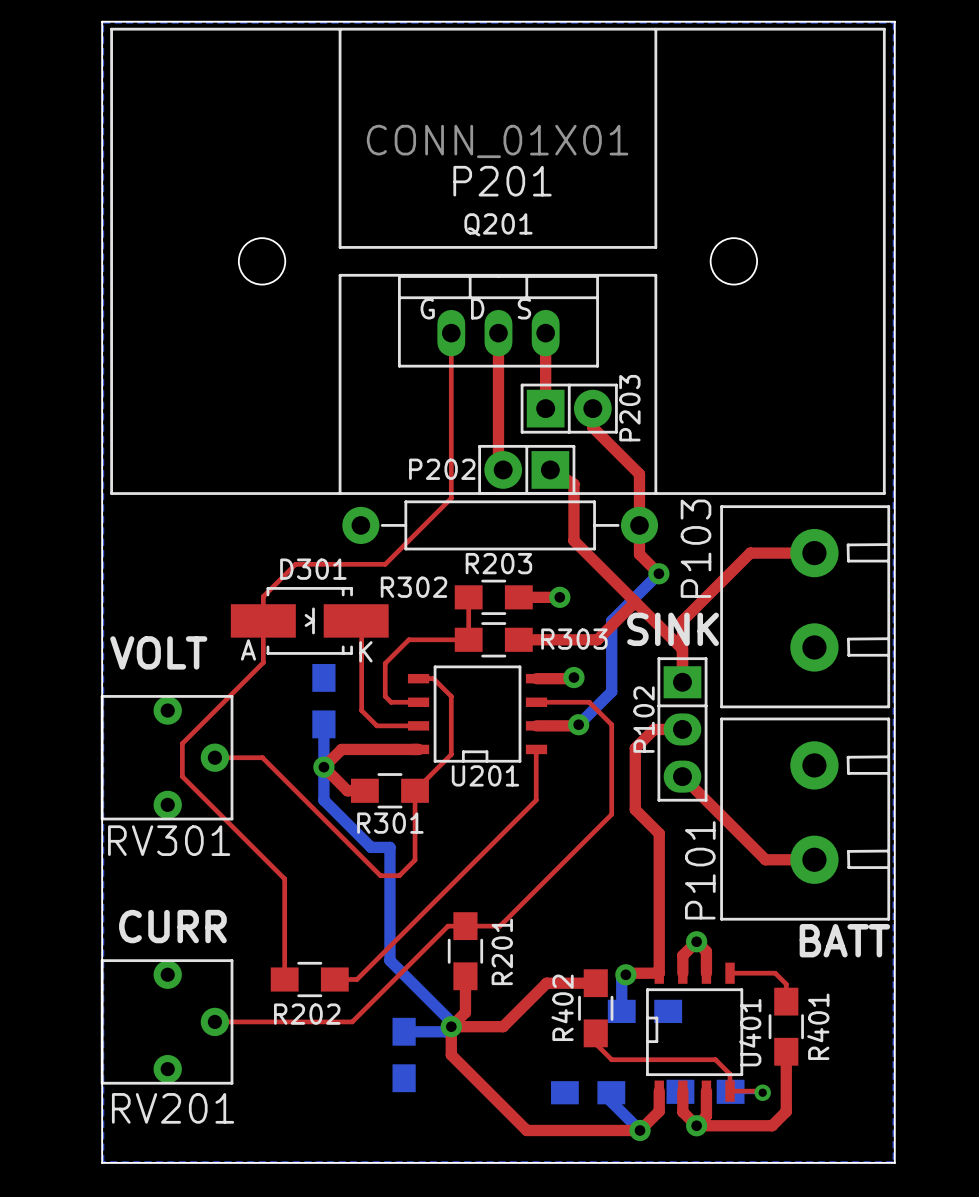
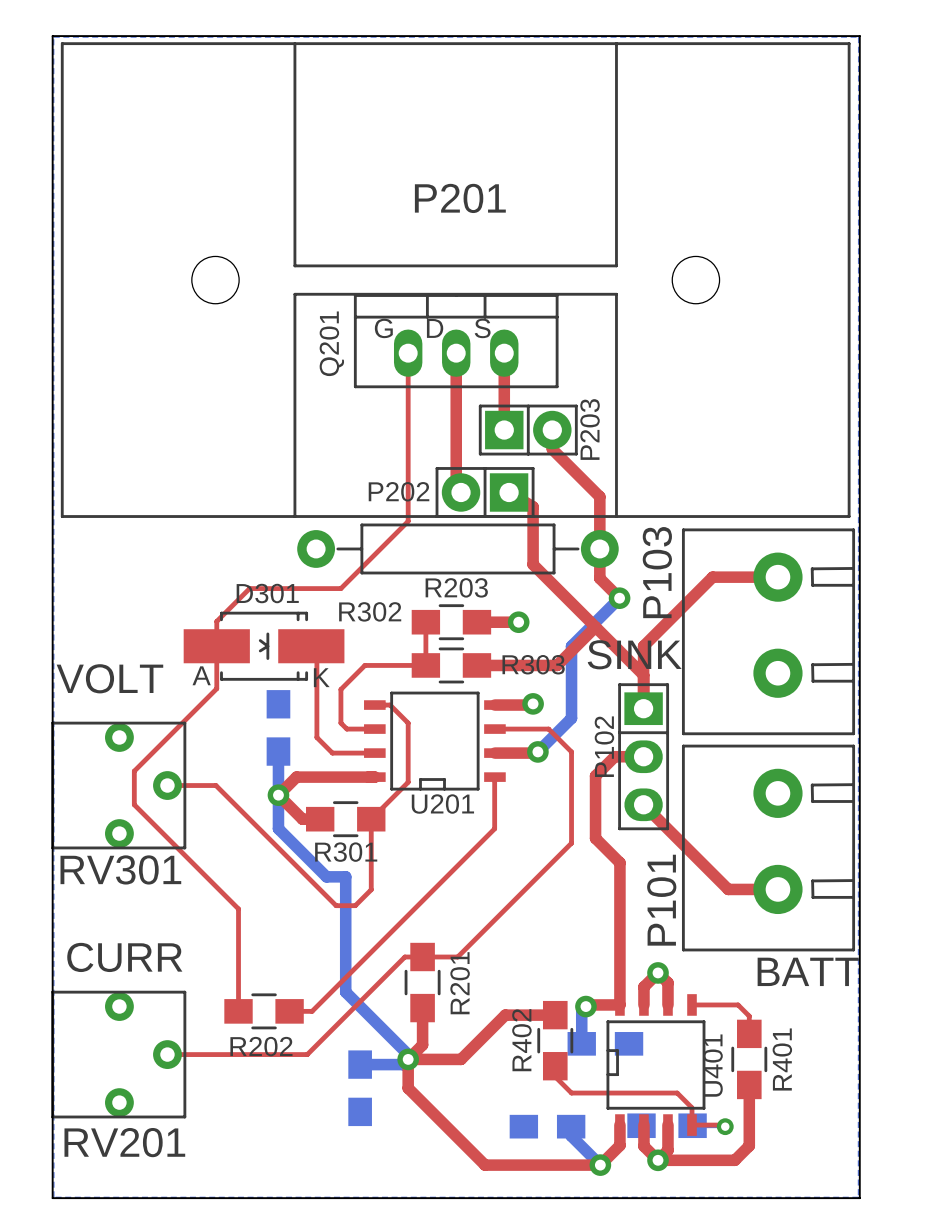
P201 value: CONN_01X01 (497, 141) -> none
Q201 name rotation: 0° (498, 224) -> 90° counterclockwise (331, 343)
Q201 name position: Q201 (498, 224) -> Q201 (331, 343)

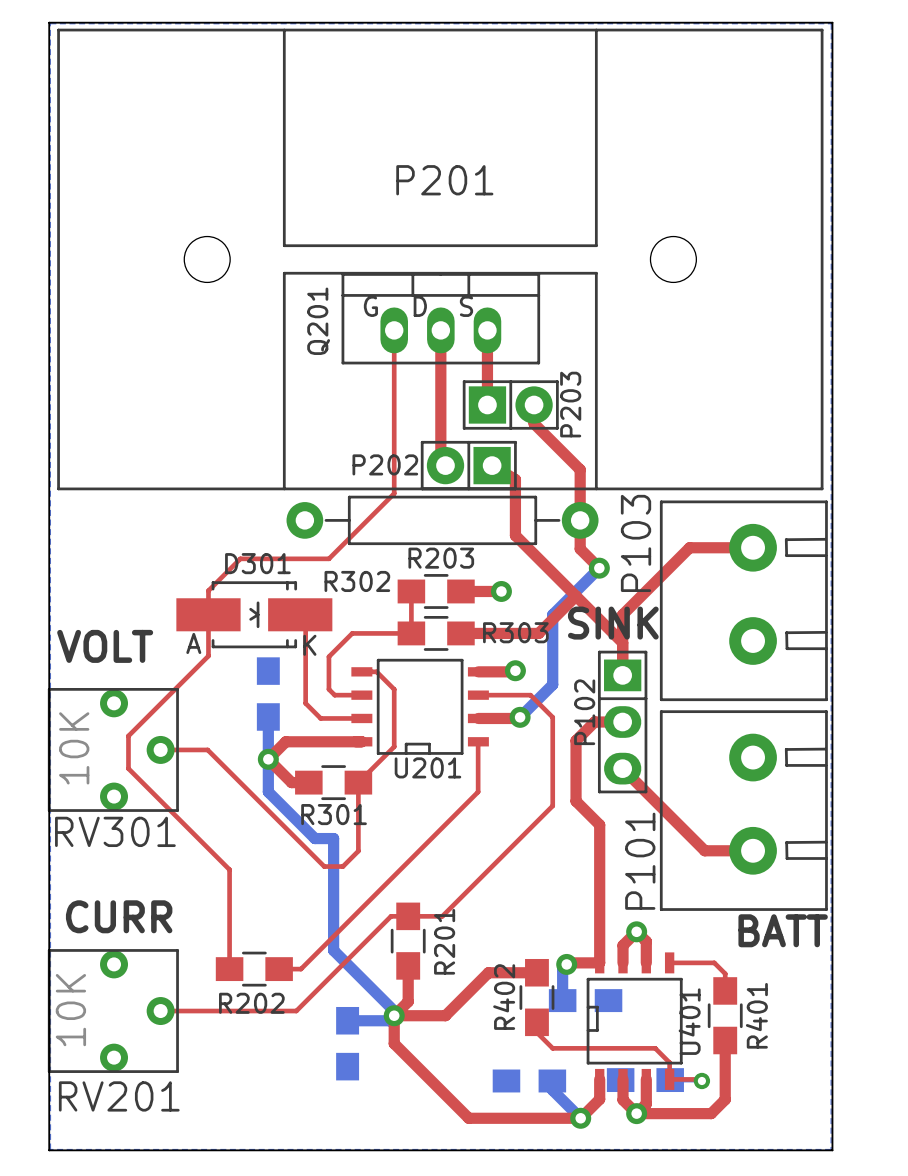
RV301 value: none -> 10K (74, 748)
RV201 value: none -> 10K (70, 1010)

